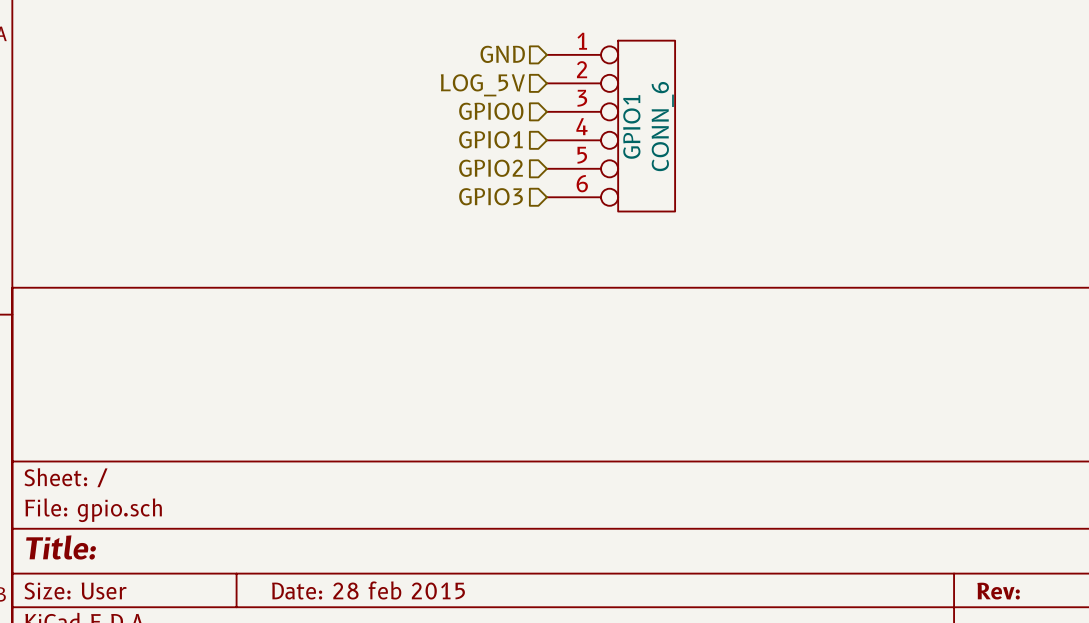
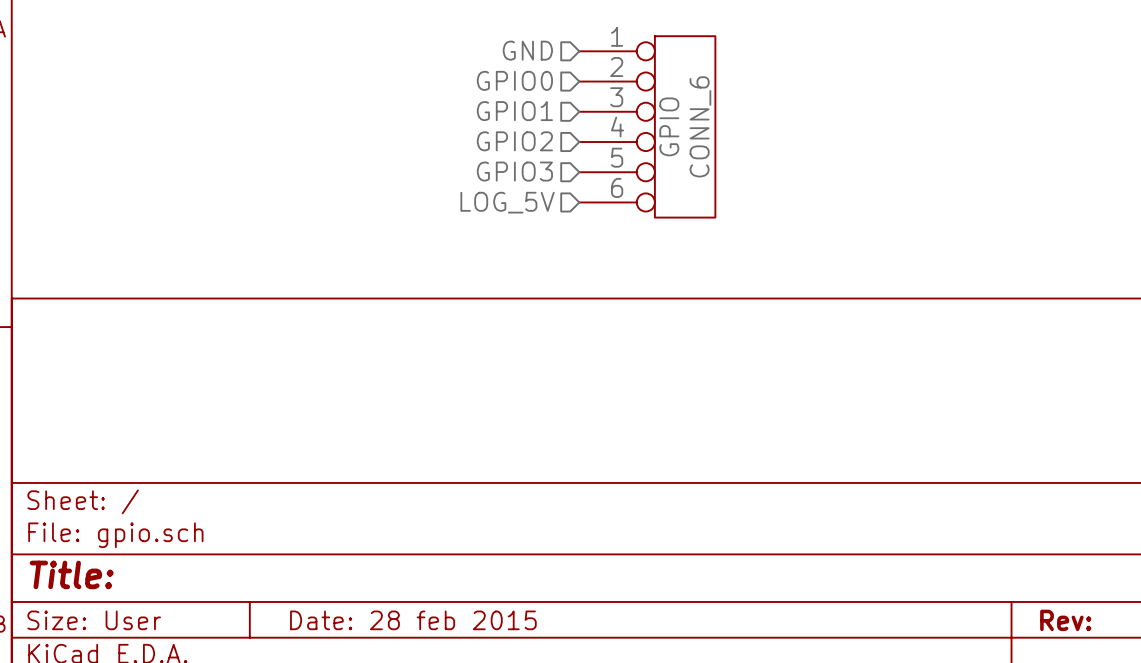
hierarchical label: LOG_5V (482, 85) -> GPIO0 (514, 80)
hierarchical label: GPIO0 (491, 111) -> GPIO1 (514, 111)
GPIO1 name: GPIO1 (631, 126) -> GPIO (669, 126)
hierarchical label: GPIO1 (490, 139) -> GPIO2 (514, 141)
hierarchical label: GPIO2 (491, 168) -> GPIO3 (514, 171)
hierarchical label: GPIO3 (491, 196) -> LOG_5V (507, 202)

